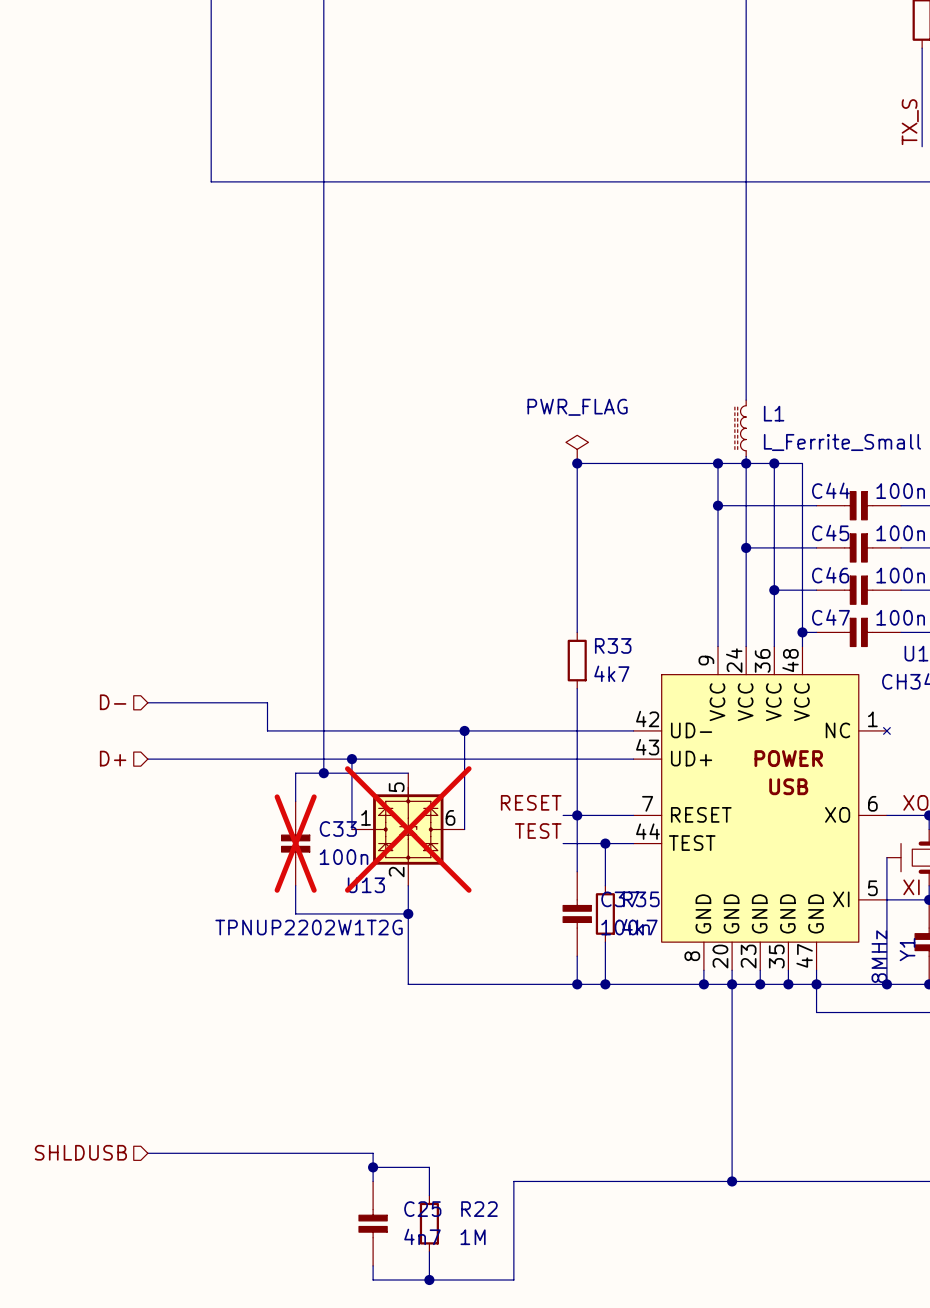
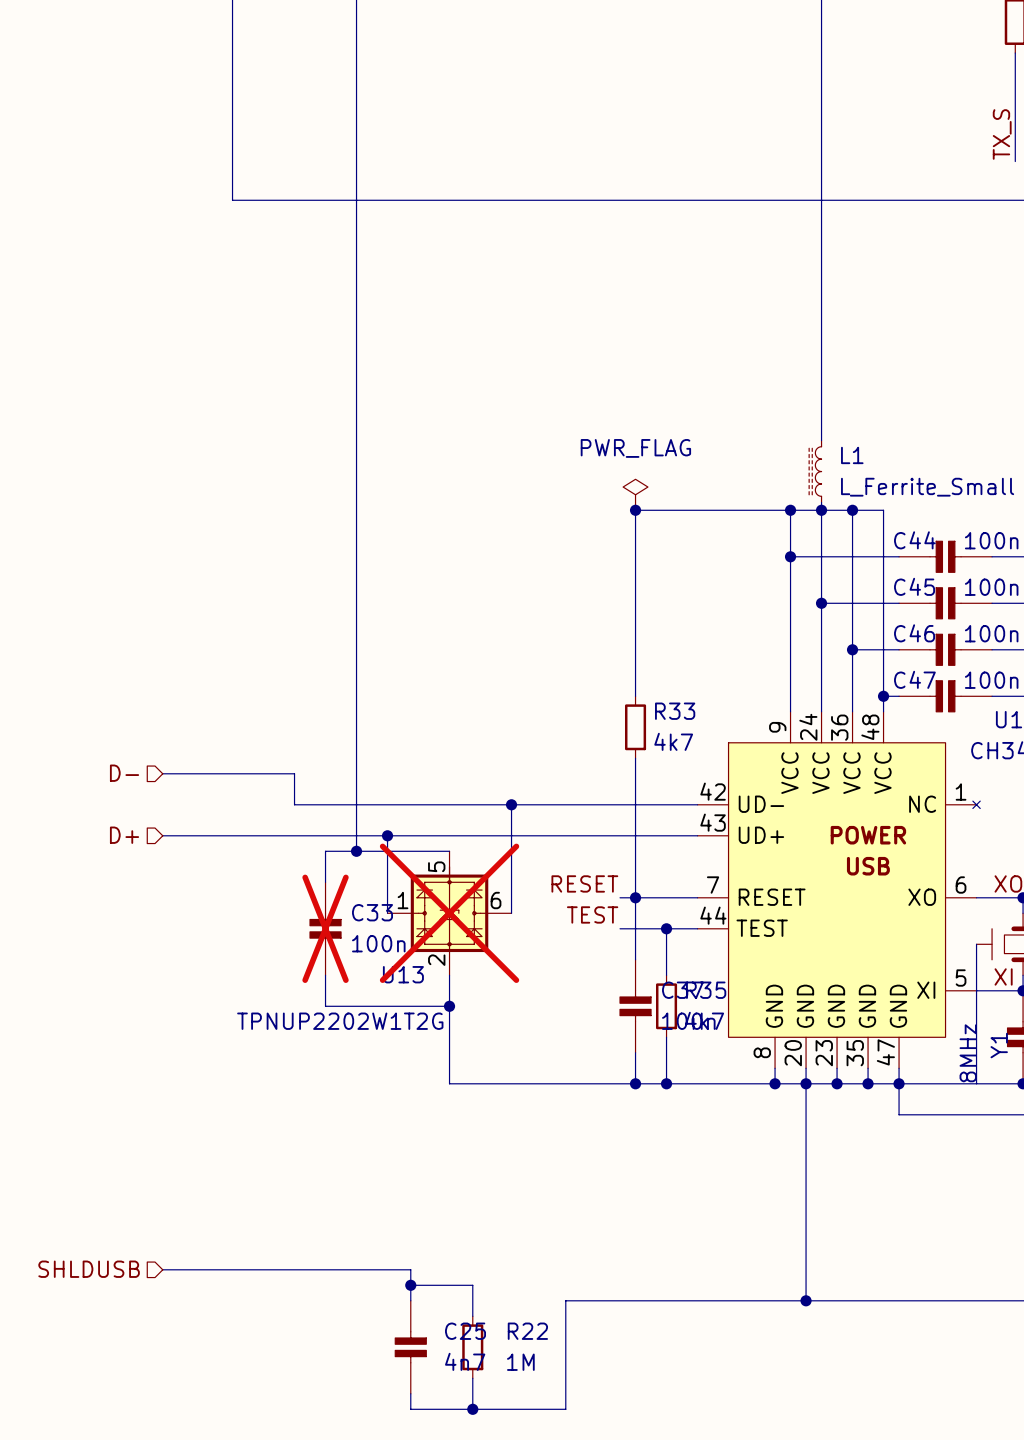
junction: (886, 984) -> none

